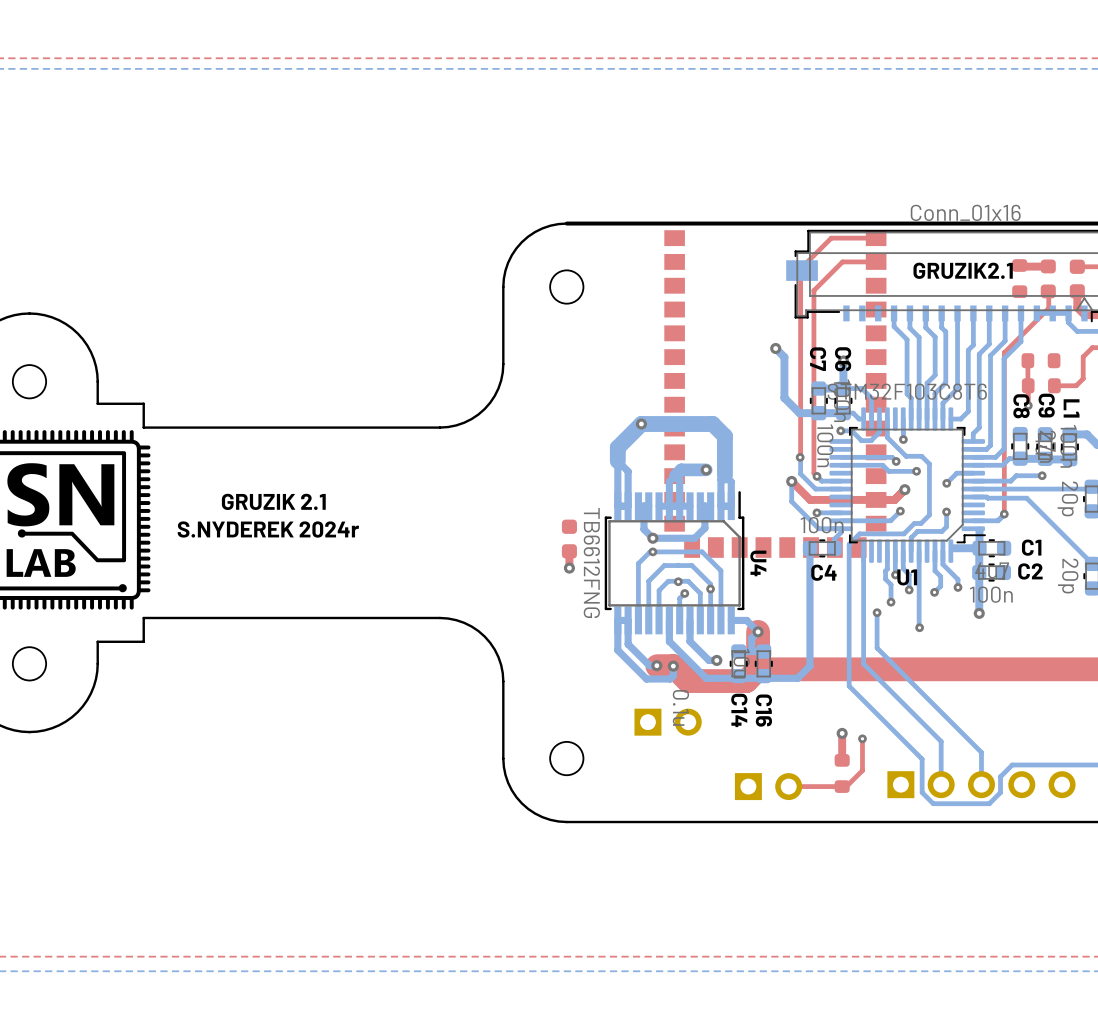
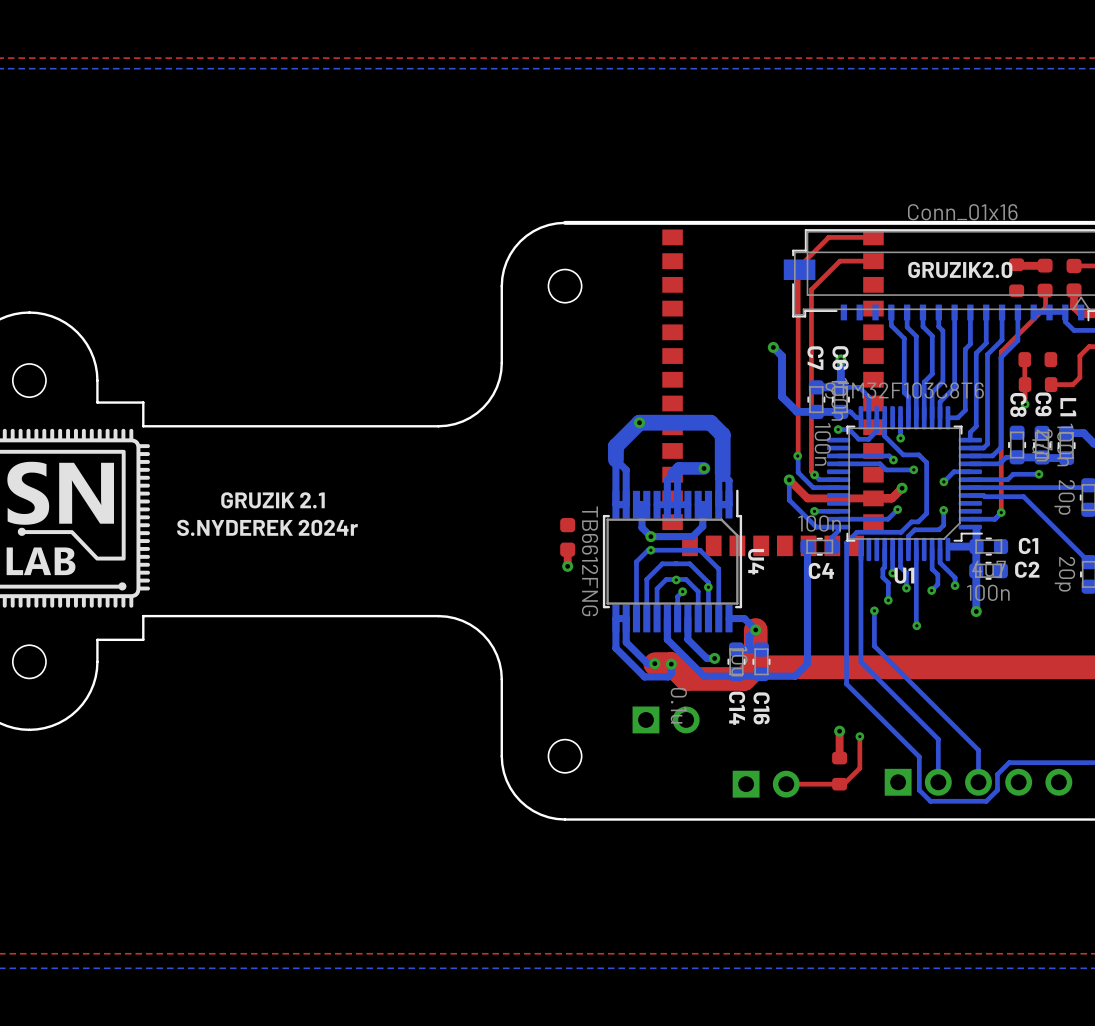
GRUZIK2.1 name: GRUZIK2.1 (963, 270) -> GRUZIK2.0 (960, 269)

